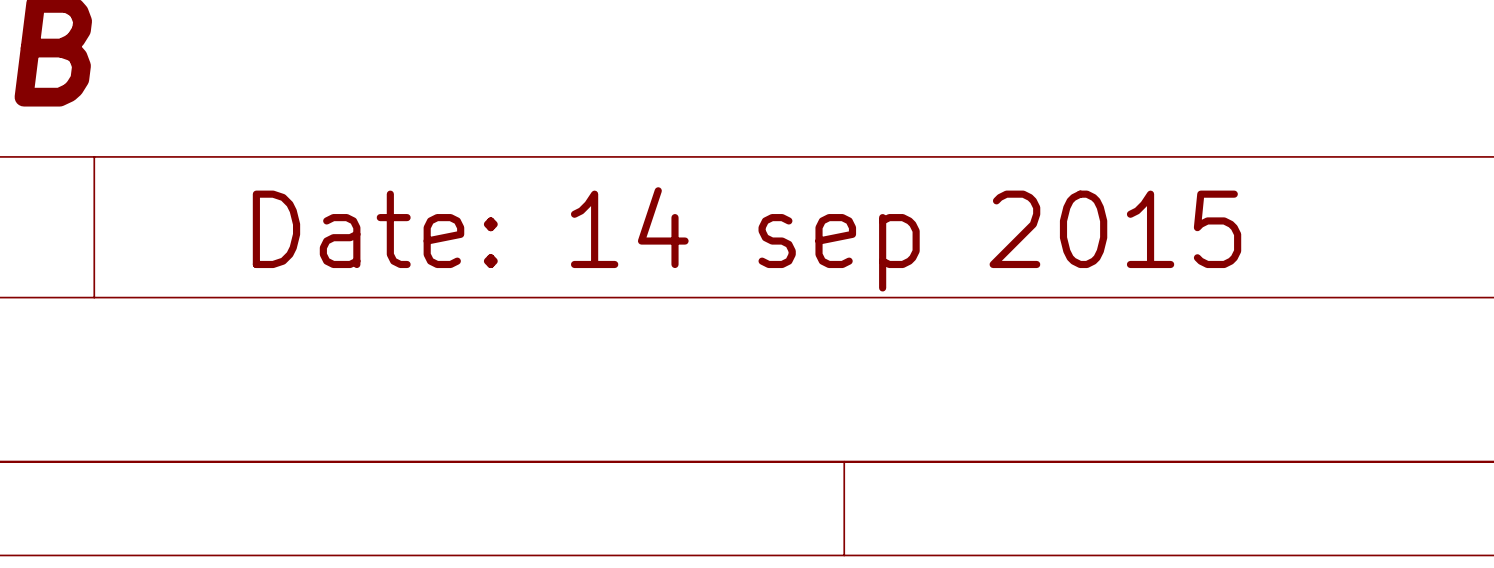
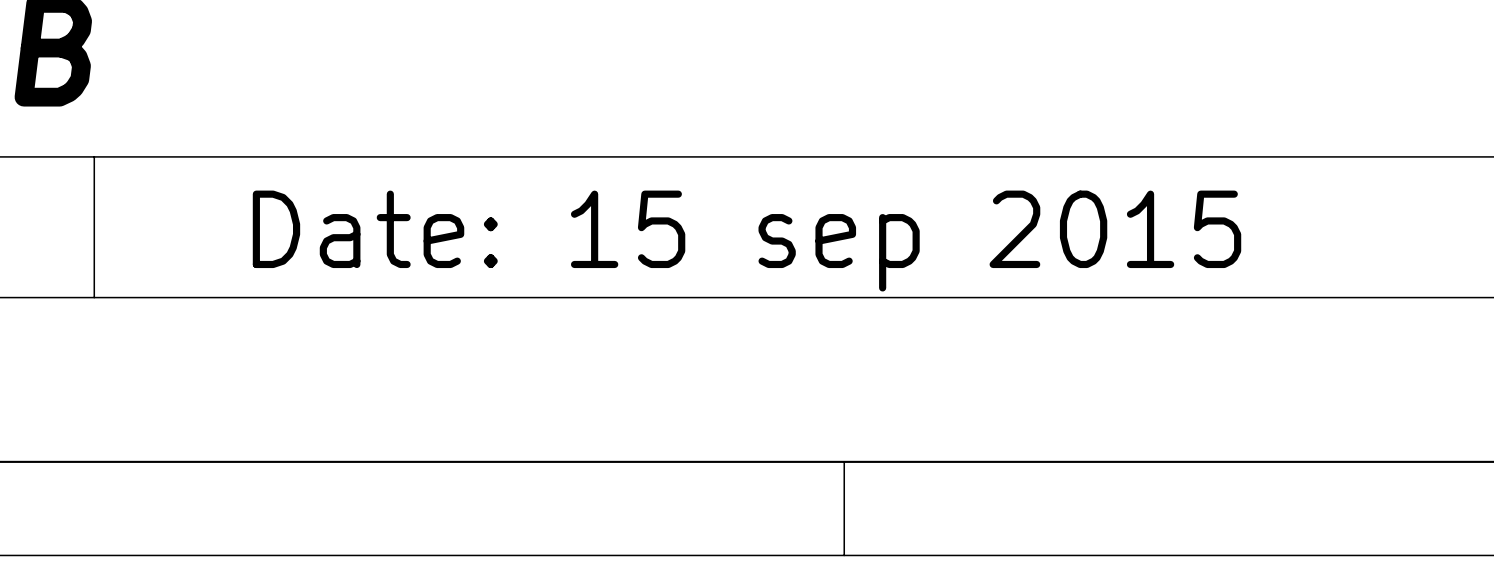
title block: Date: 14 sep 2015 (747, 239) -> Date: 15 sep 2015 (747, 241)

